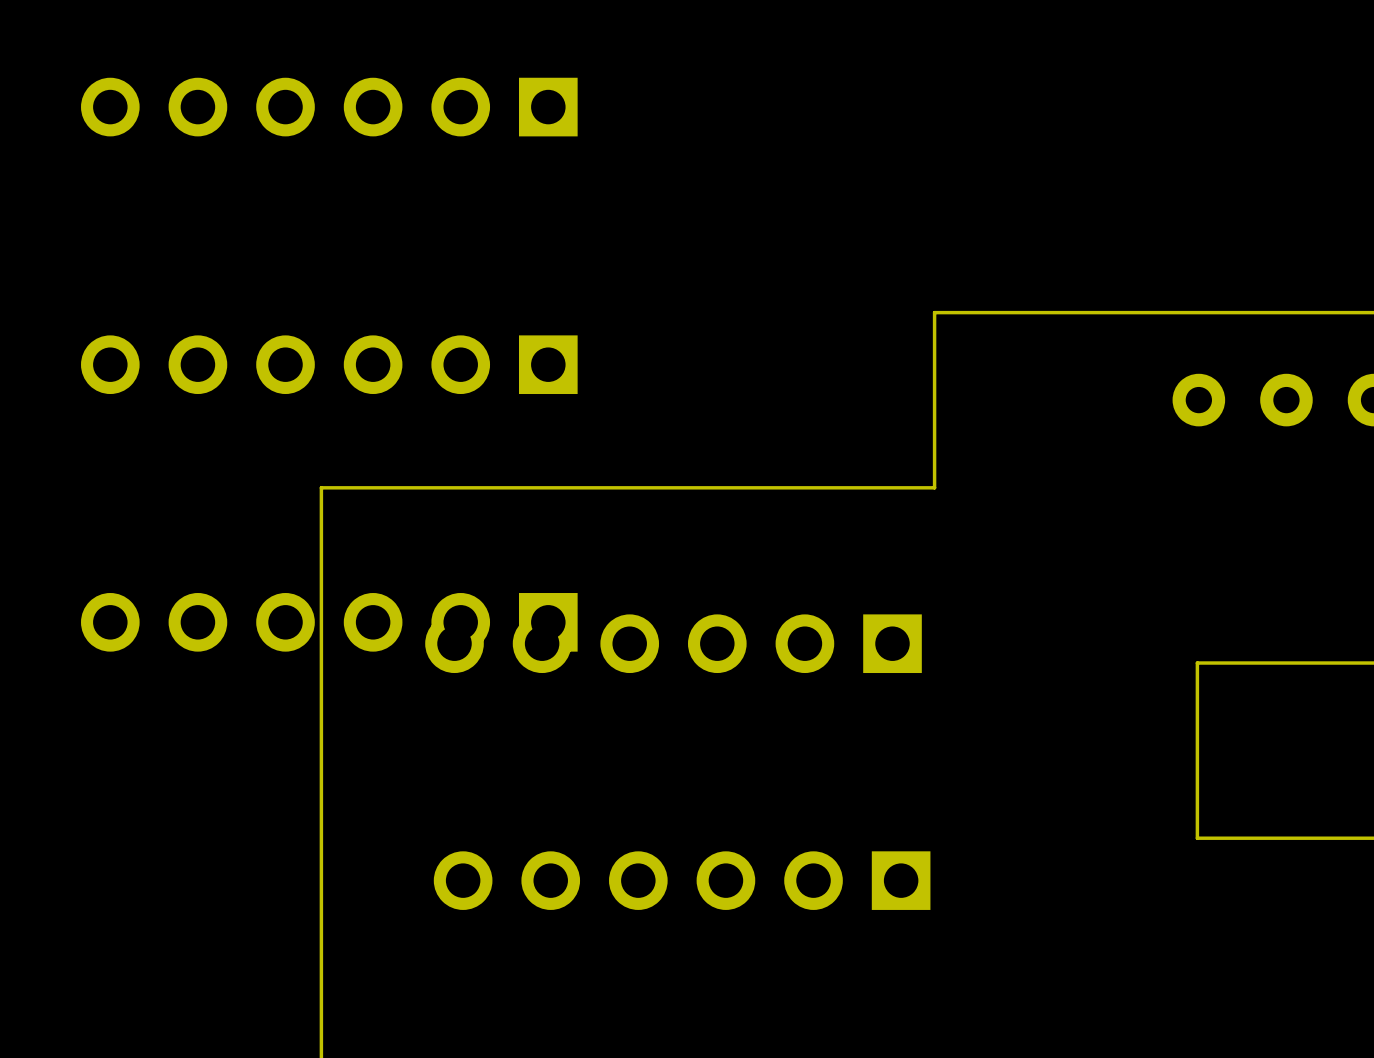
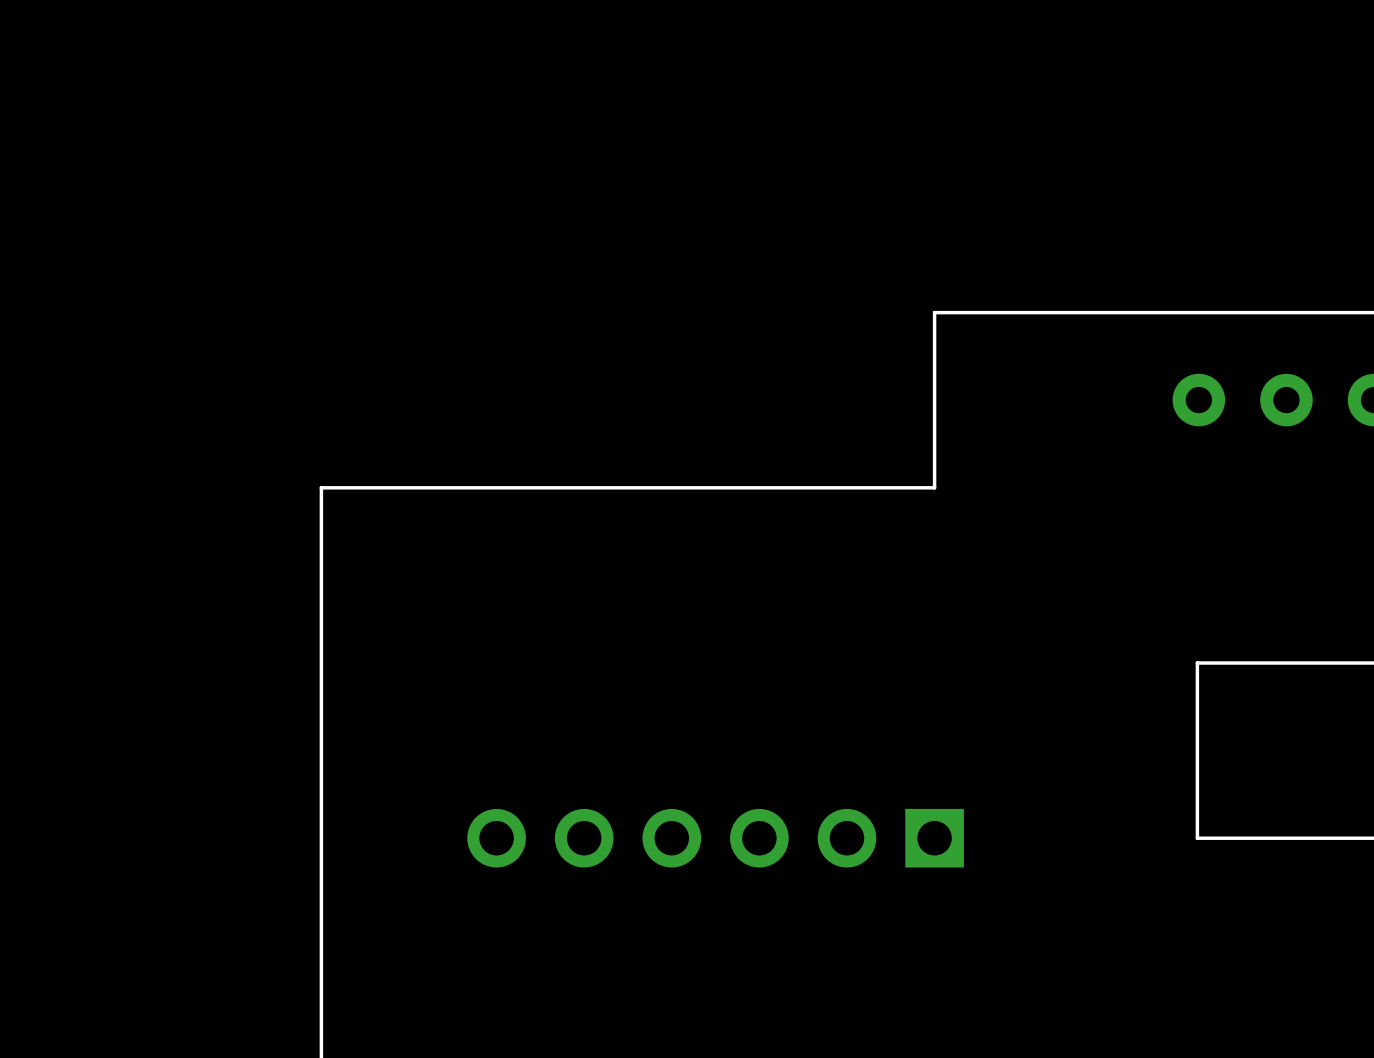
part: (329, 107) -> none
part: (329, 364) -> none
part: (329, 622) -> none
part: (673, 643) -> none
part position: (682, 880) -> (715, 838)

